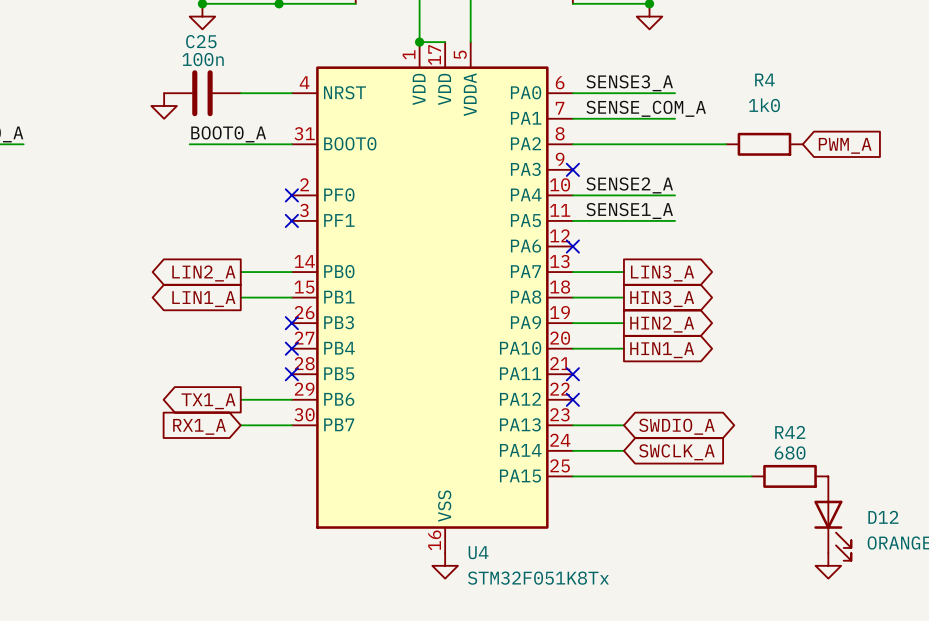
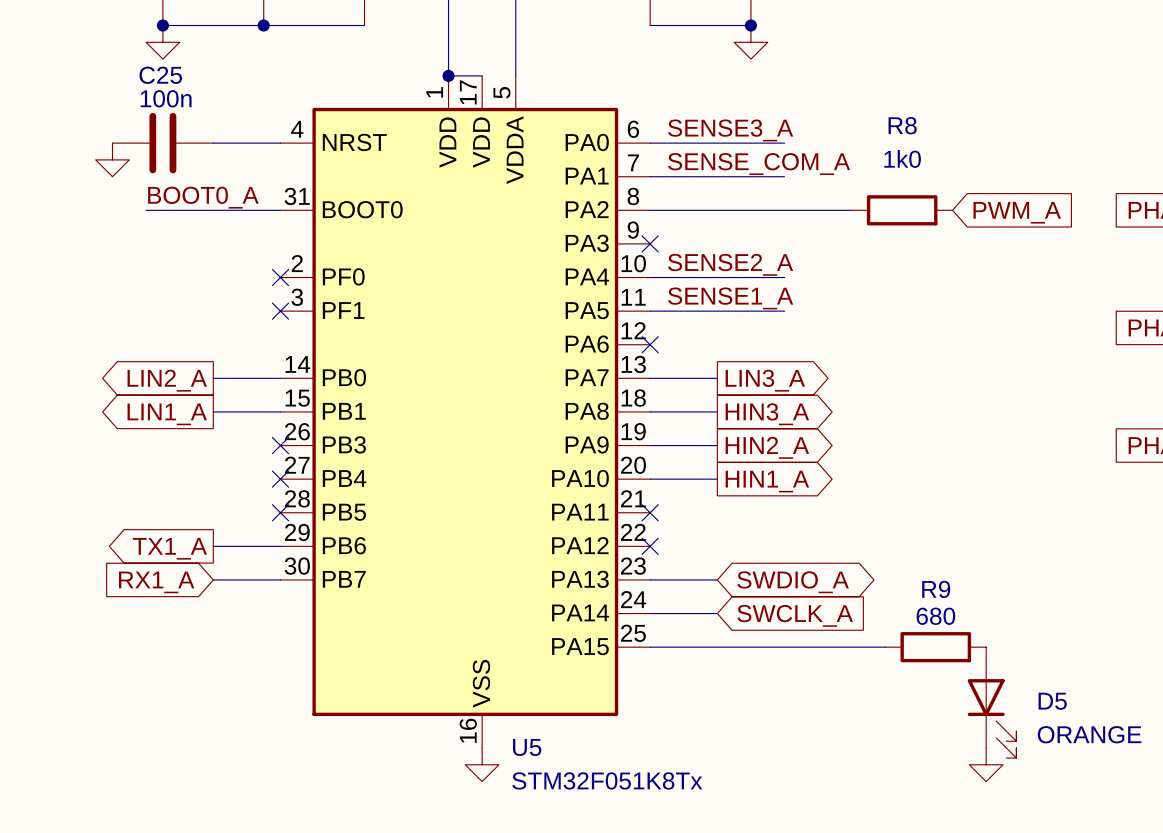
R4 name: R4 (764, 79) -> R8 (902, 125)
R42 name: R42 (790, 432) -> R9 (936, 589)
D12 name: D12 (883, 517) -> D5 (1052, 701)
U4 name: U4 (478, 552) -> U5 (527, 747)

